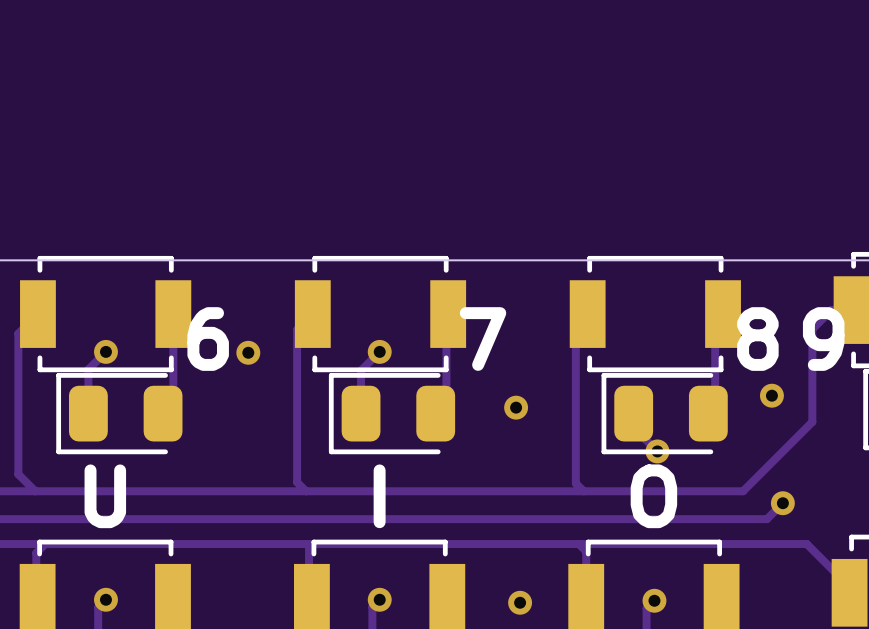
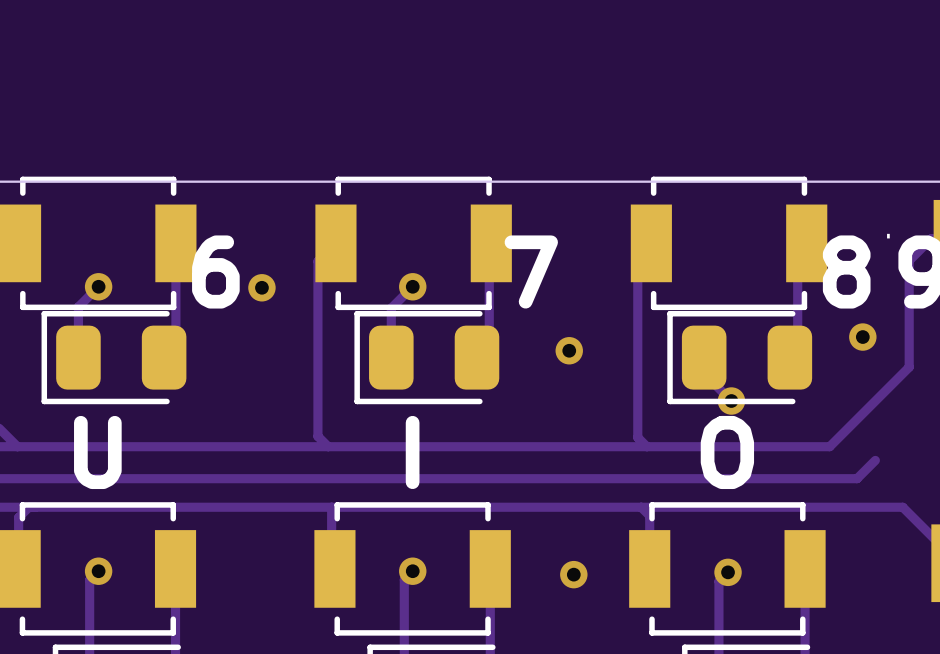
line: none -> (887, 236) (889, 236)
via: (782, 503) -> none

